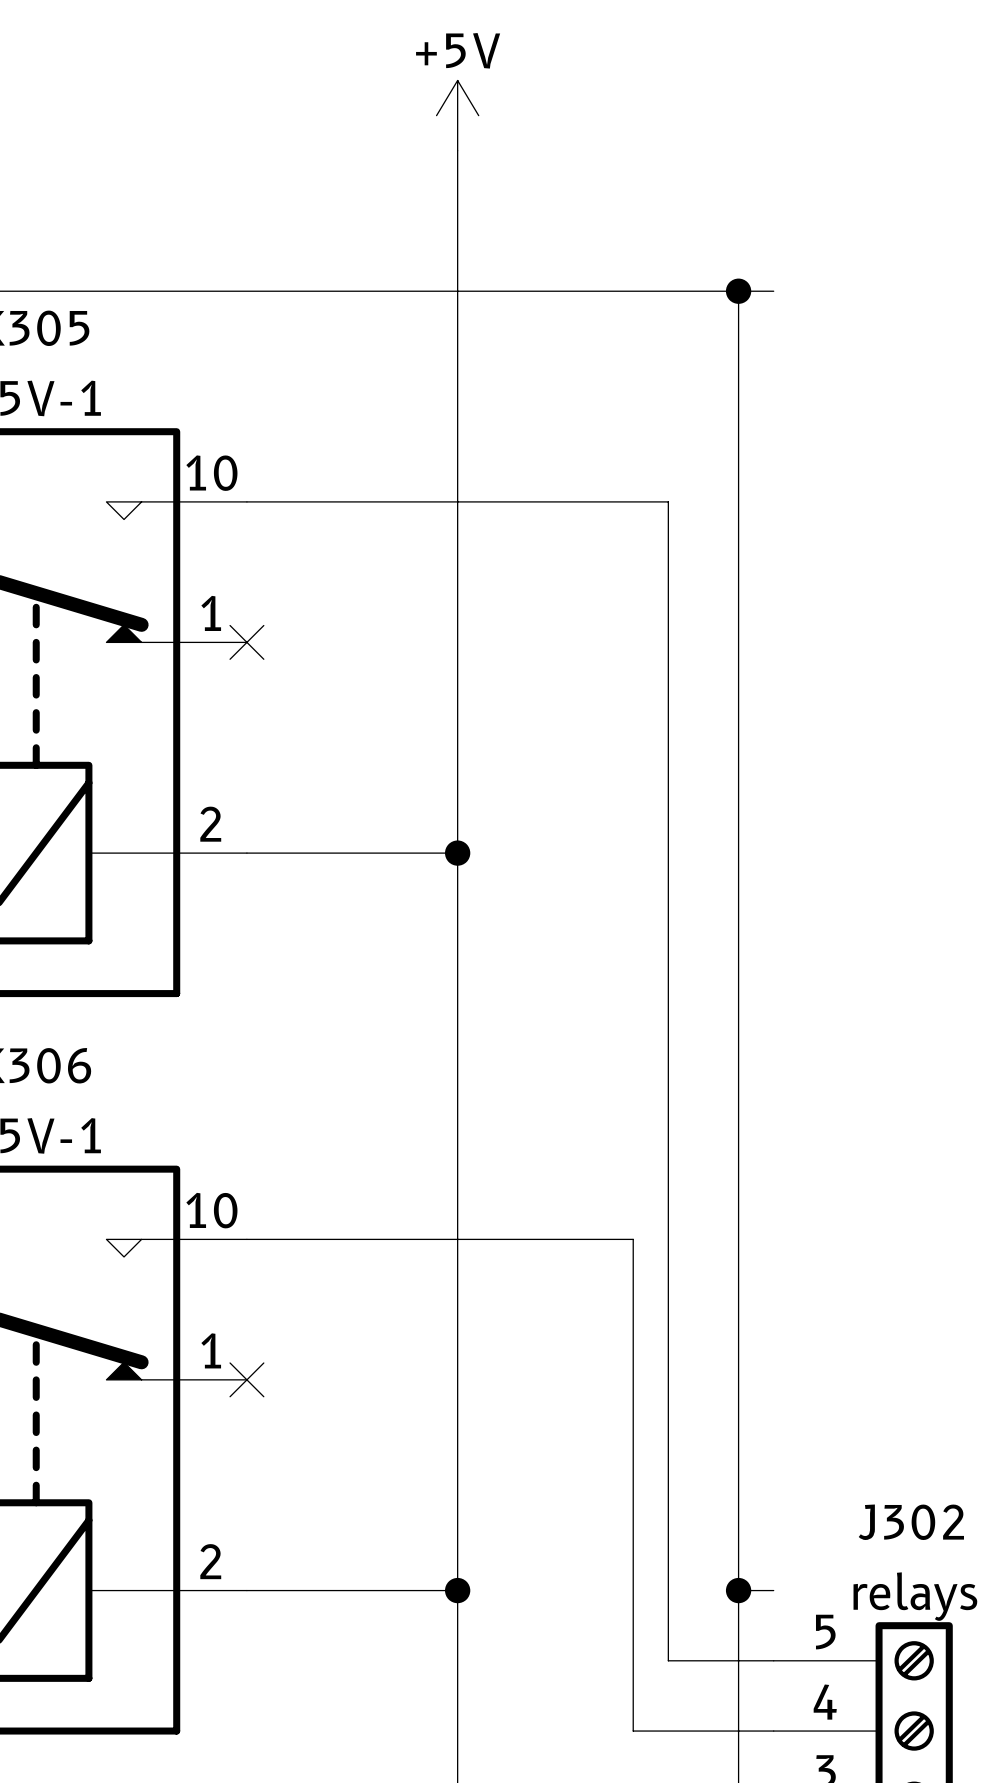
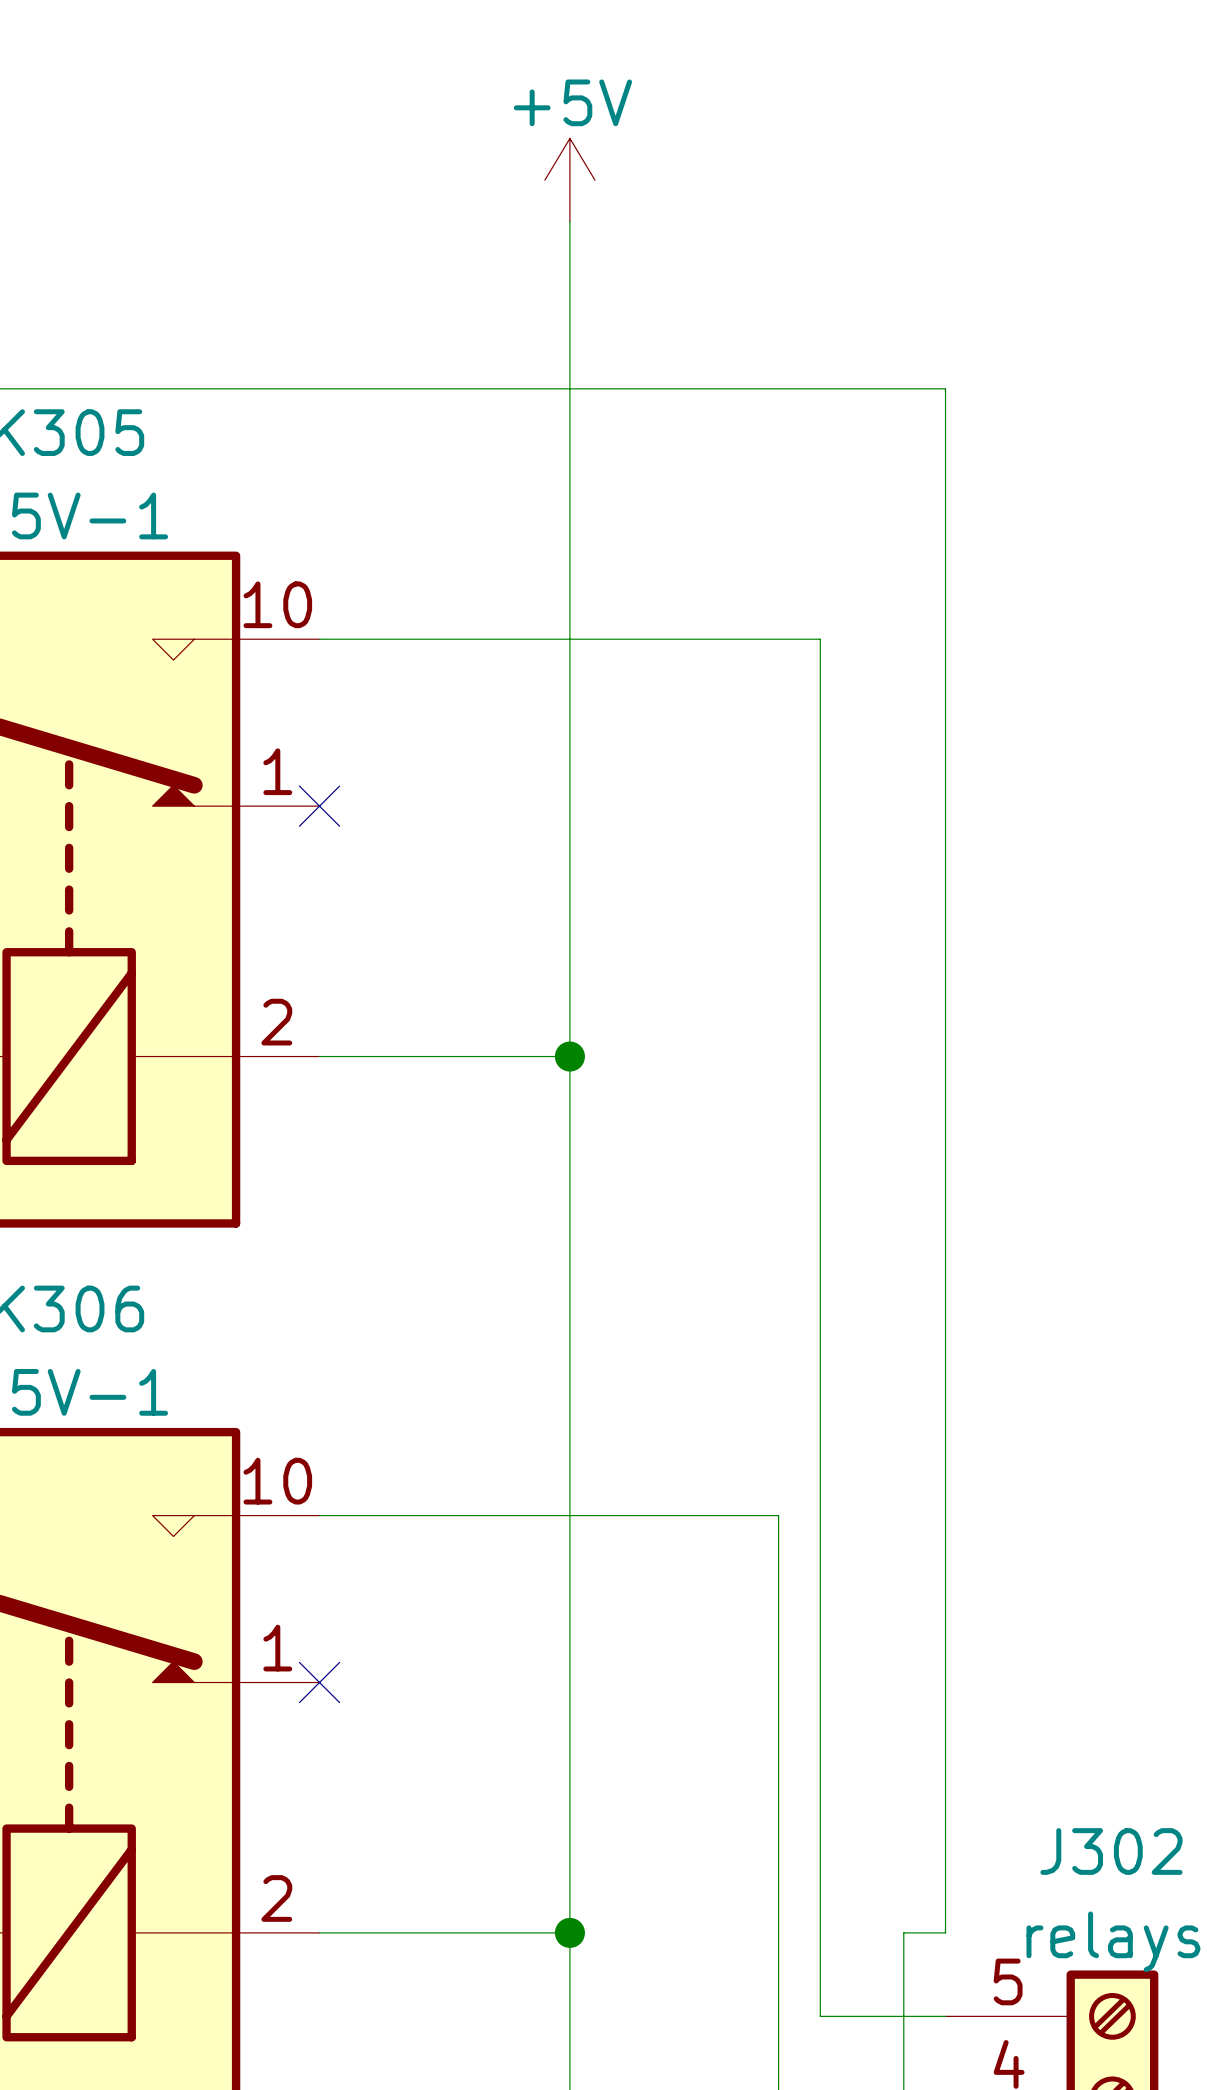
wire: (738, 291) (738, 1590) -> (945, 388) (945, 1932)
junction: (738, 291) -> none
junction: (738, 1590) -> none

